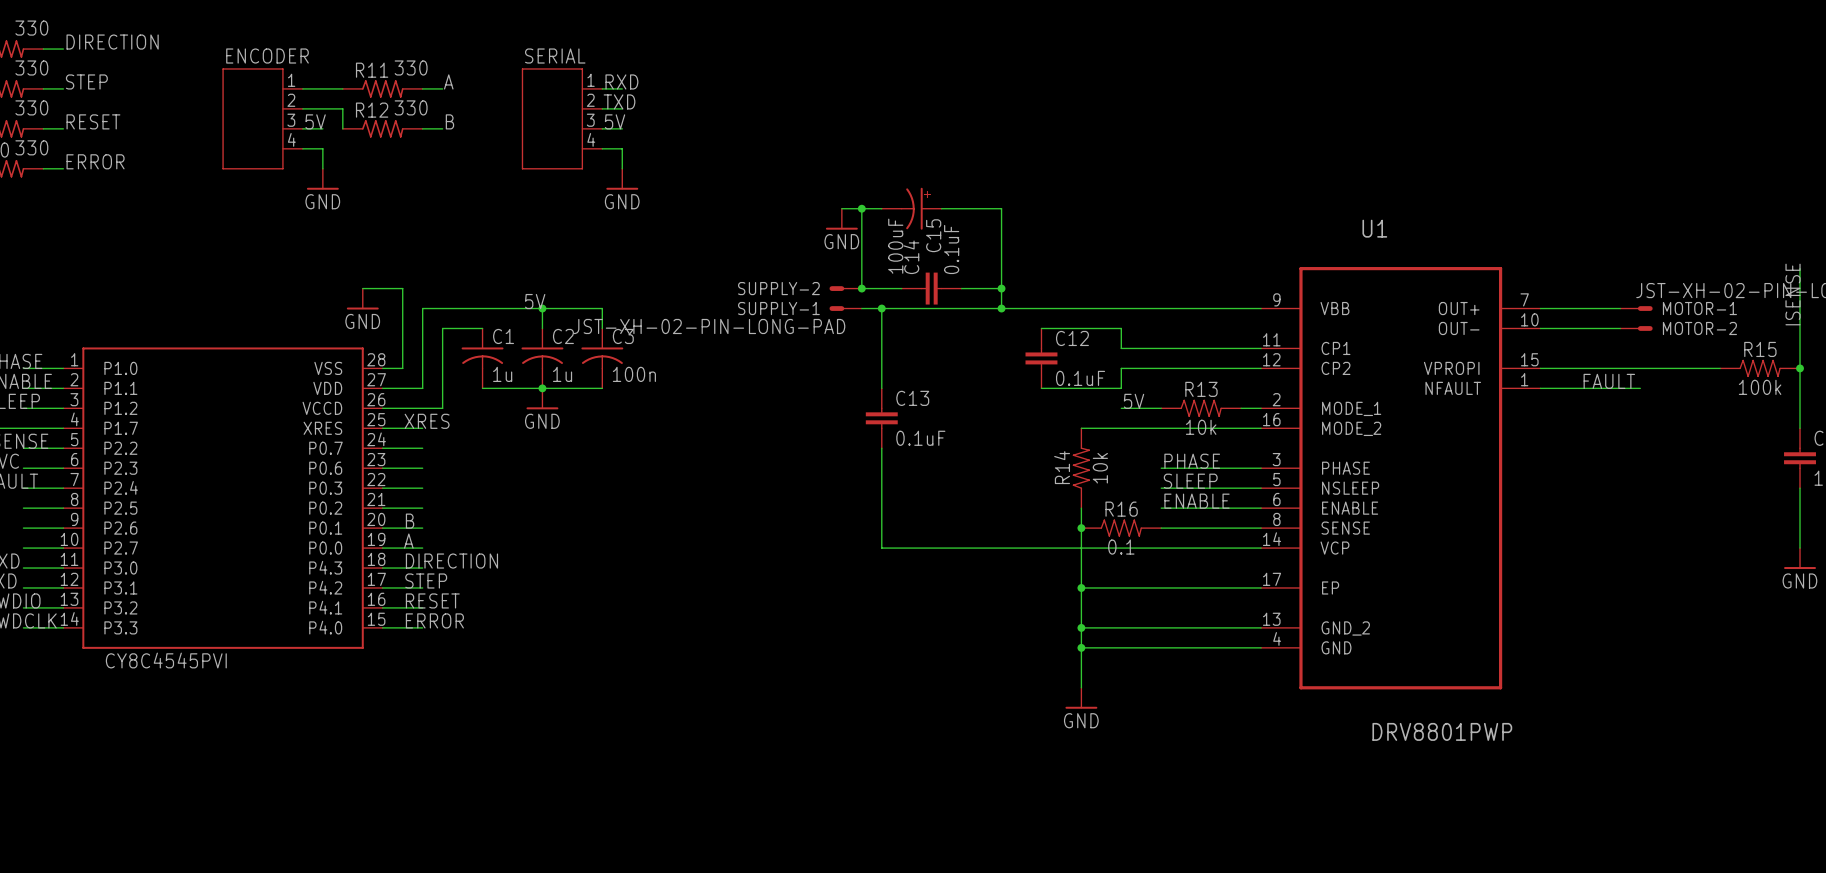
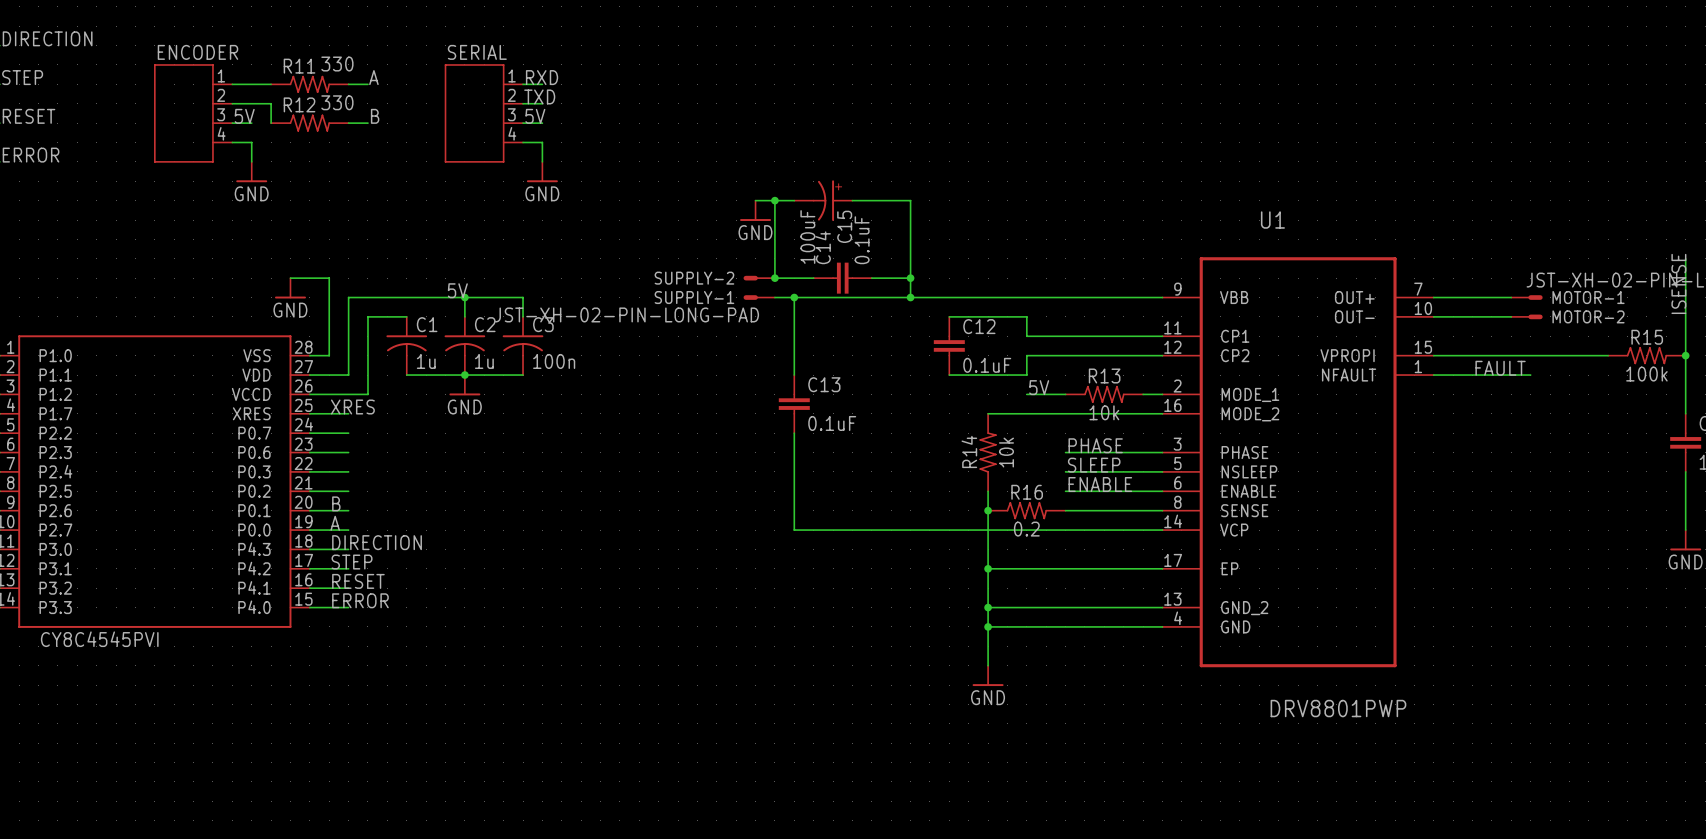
R16 value: 0.1 (1121, 547) -> 0.2 (1026, 529)

